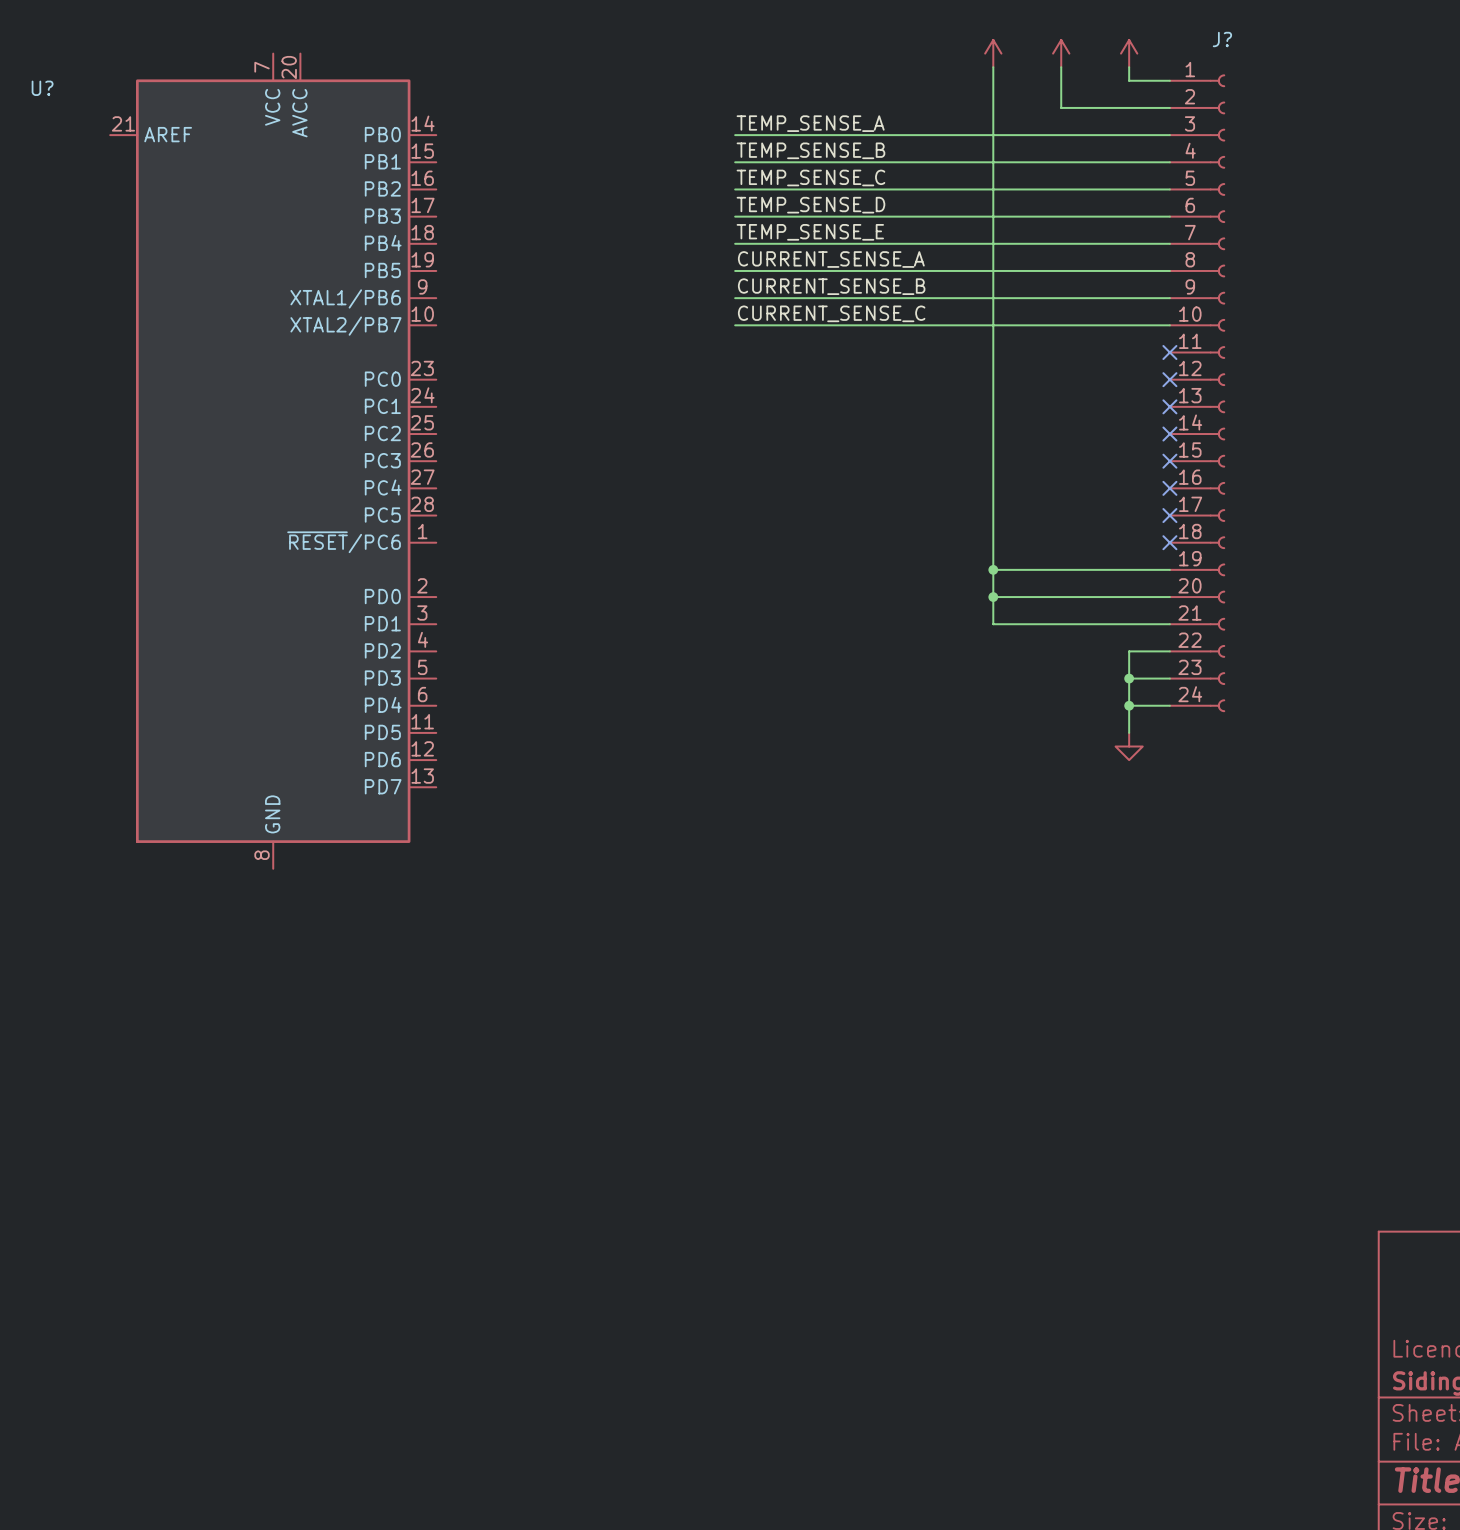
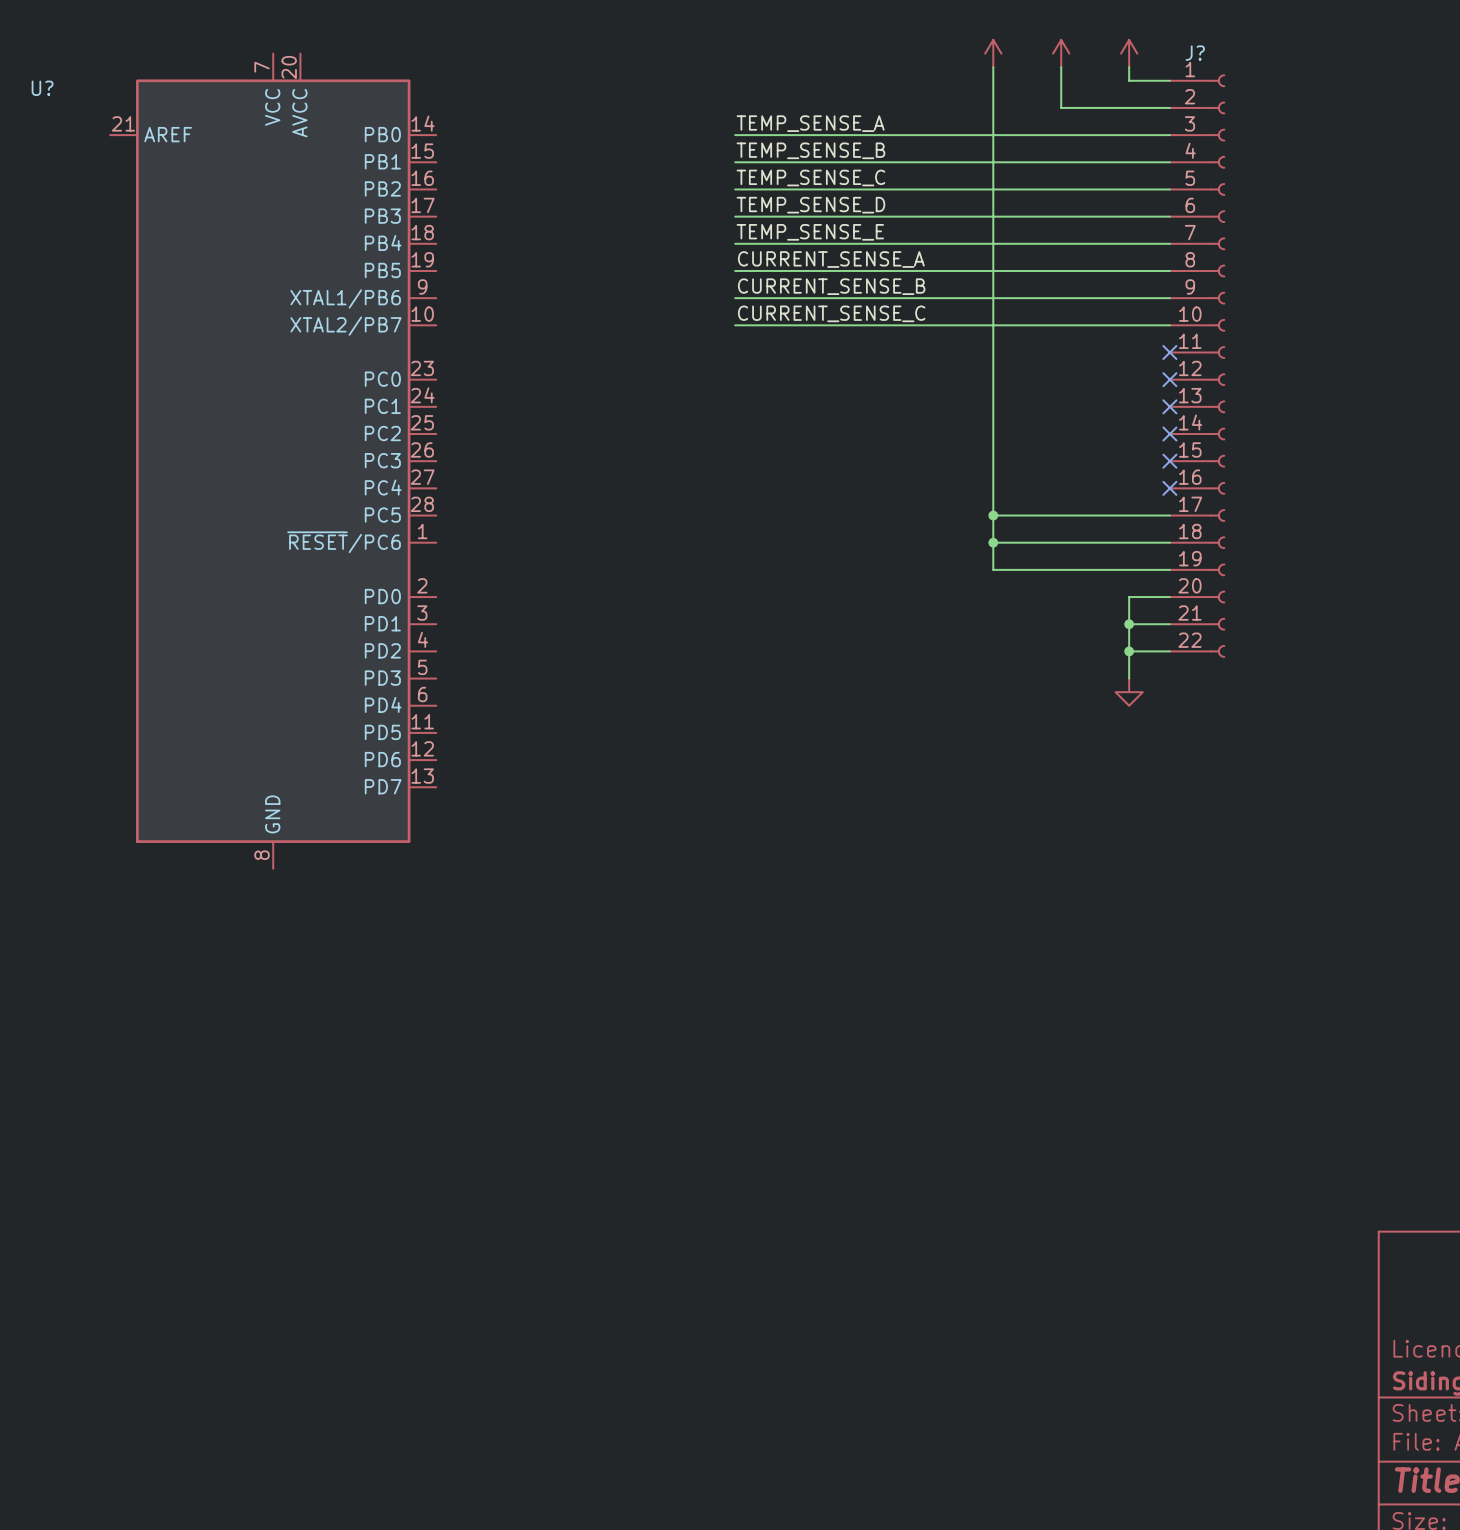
J?: none -> (1197, 366)
J?: (1197, 393) -> none
wire: none -> (993, 515) (1169, 515)
junction: none -> (993, 515)
no-connect mark: (1169, 515) -> none
wire: none -> (993, 542) (1169, 542)
junction: none -> (993, 542)
no-connect mark: (1169, 542) -> none
wire: (993, 569) (993, 624) (1129, 624) -> none
junction: (993, 569) -> none
wire: (993, 597) (1129, 597) -> (1129, 651) (1129, 597)
junction: (993, 597) -> none
junction: none -> (1129, 624)
junction: none -> (1129, 651)
junction: (1129, 678) -> none
wire: (1169, 678) (1129, 678) (1129, 732) -> none
wire: (1129, 705) (1169, 705) -> none
junction: (1129, 705) -> none
power symbol position: (1129, 746) -> (1129, 692)

